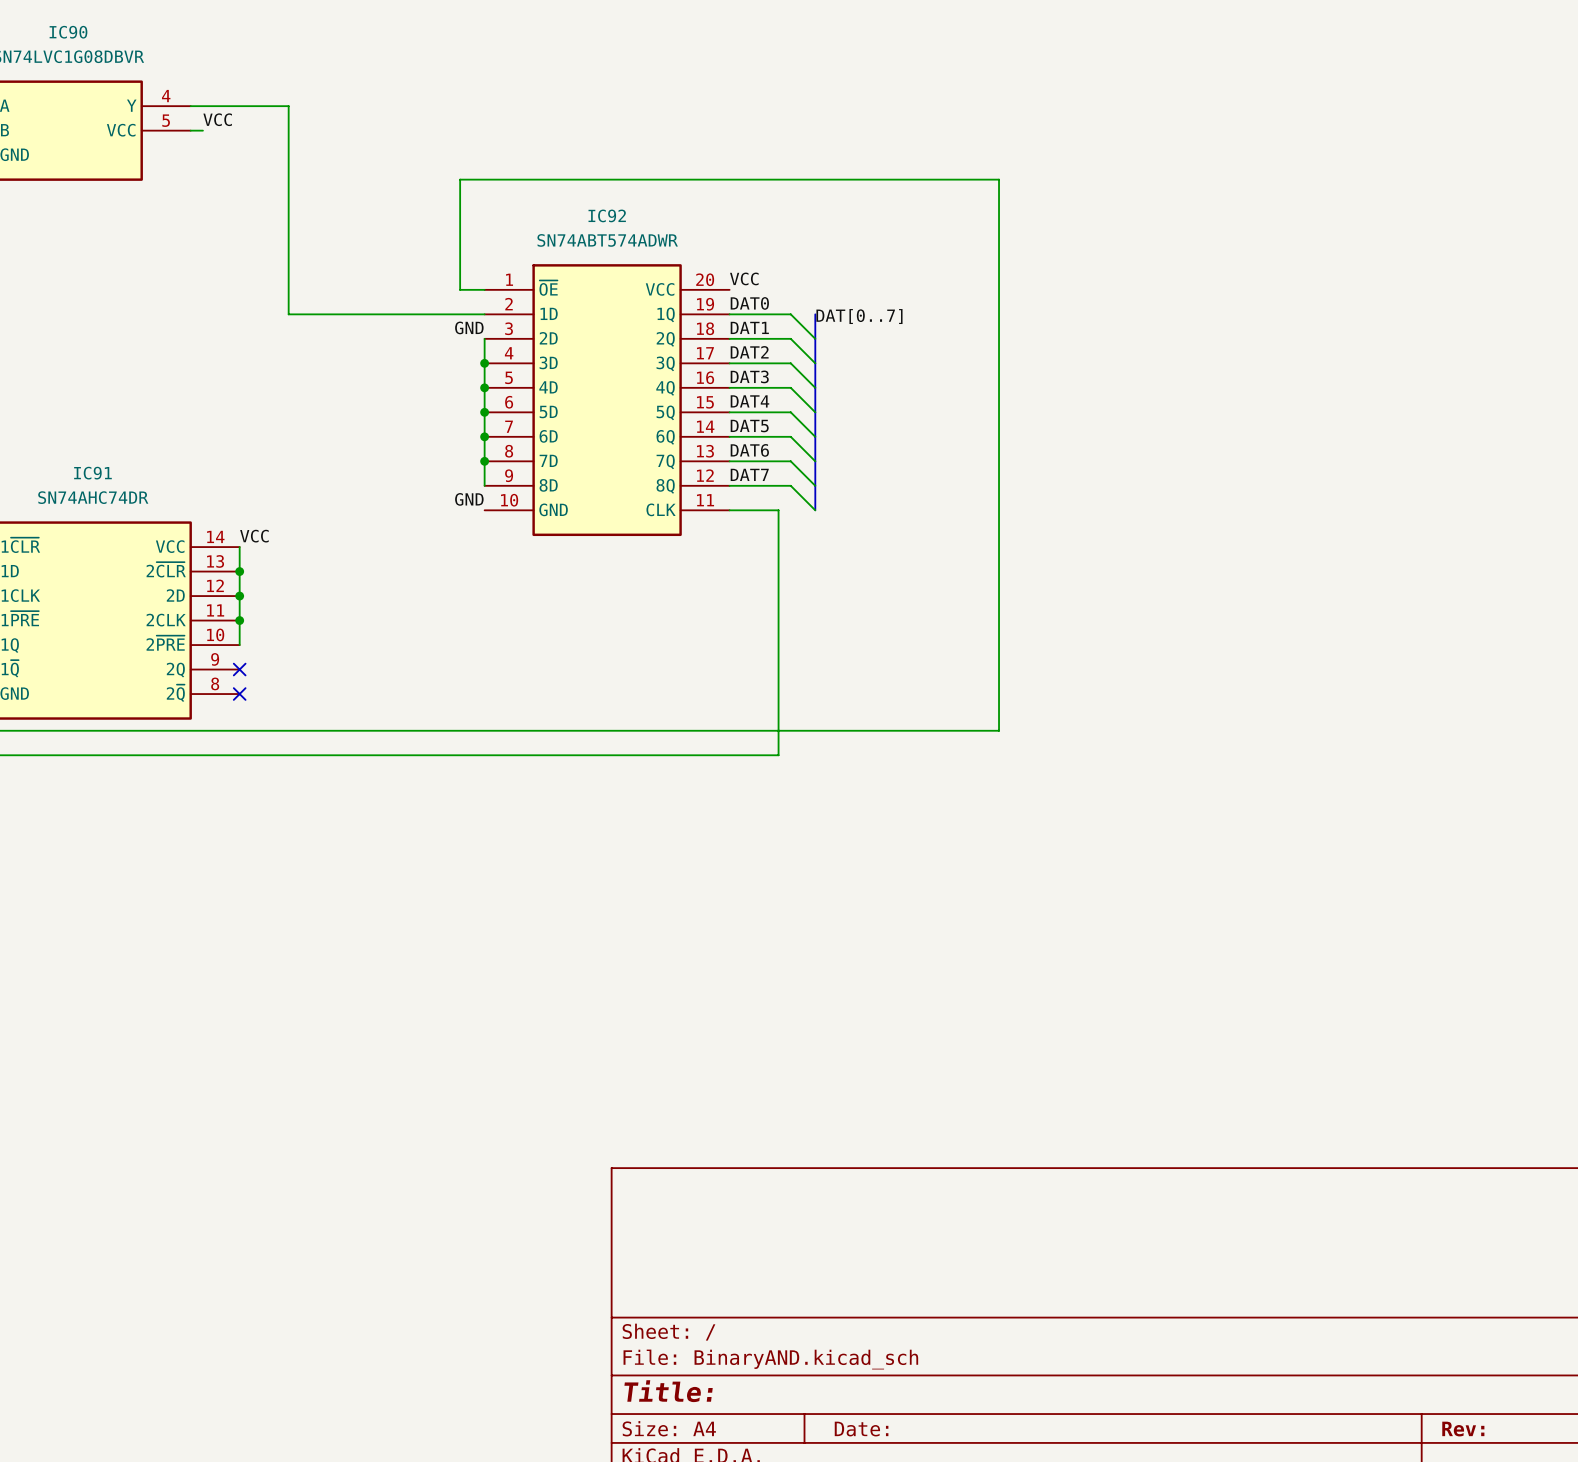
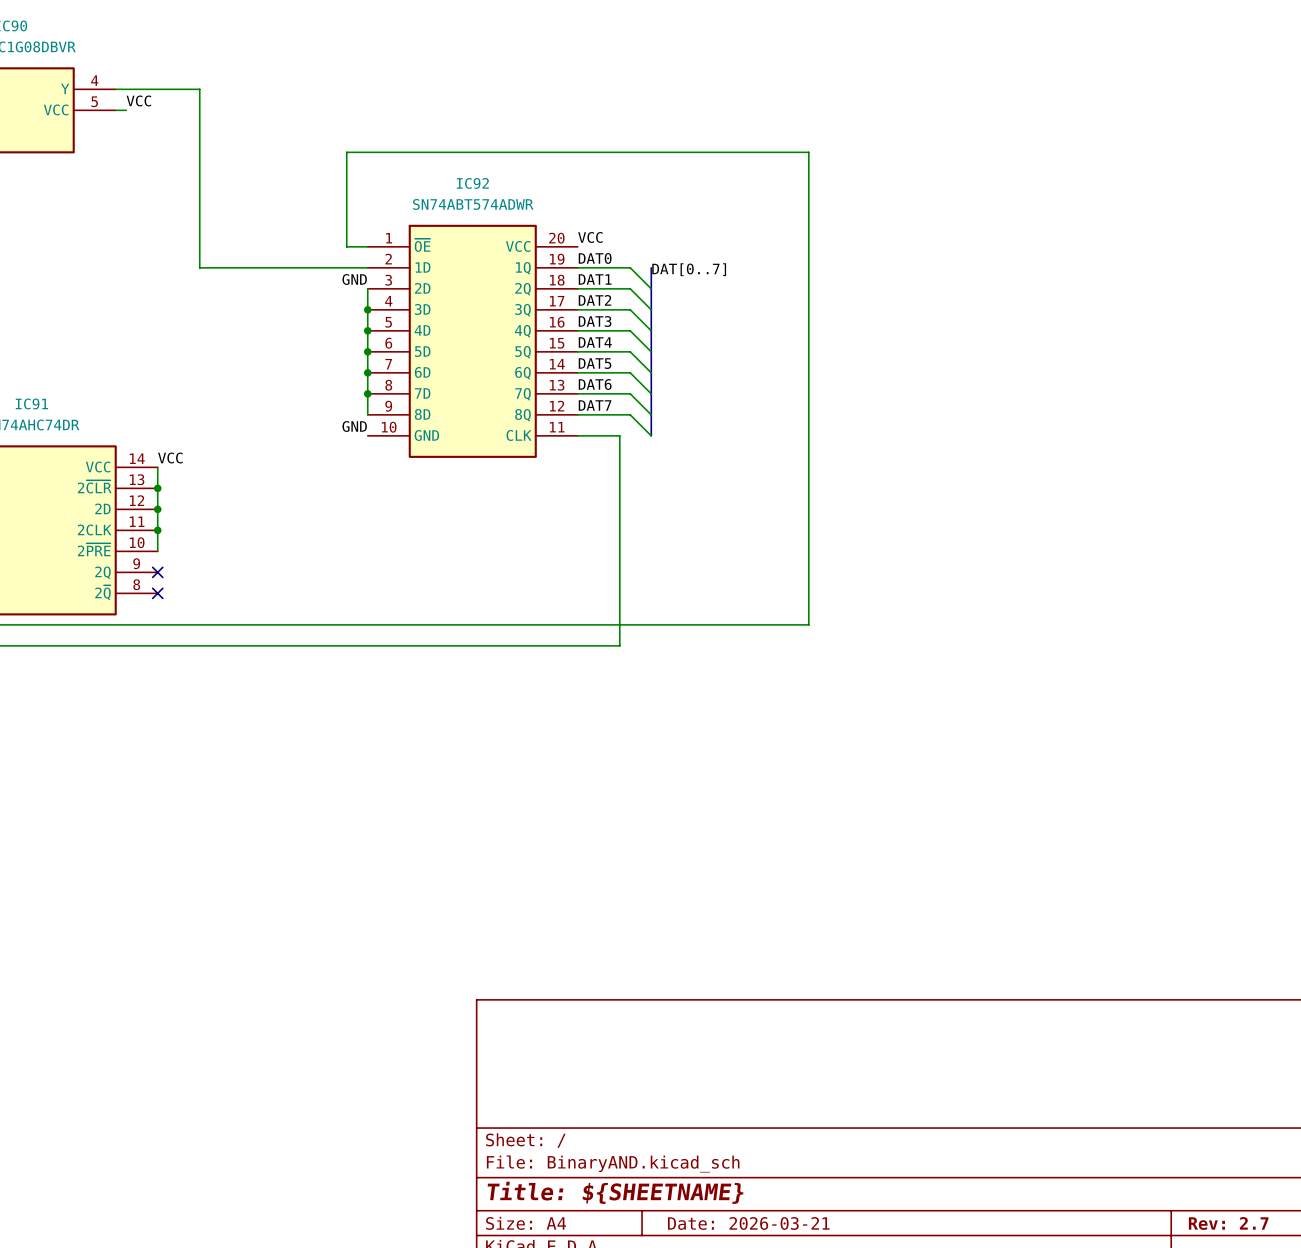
title block: Title: (668, 1391) -> Title: ${SHEETNAME} (615, 1192)
title block: Date: (861, 1429) -> Date: 2026-03-21 (748, 1223)
title block: Rev: (1463, 1429) -> Rev: 2.7 (1228, 1223)

